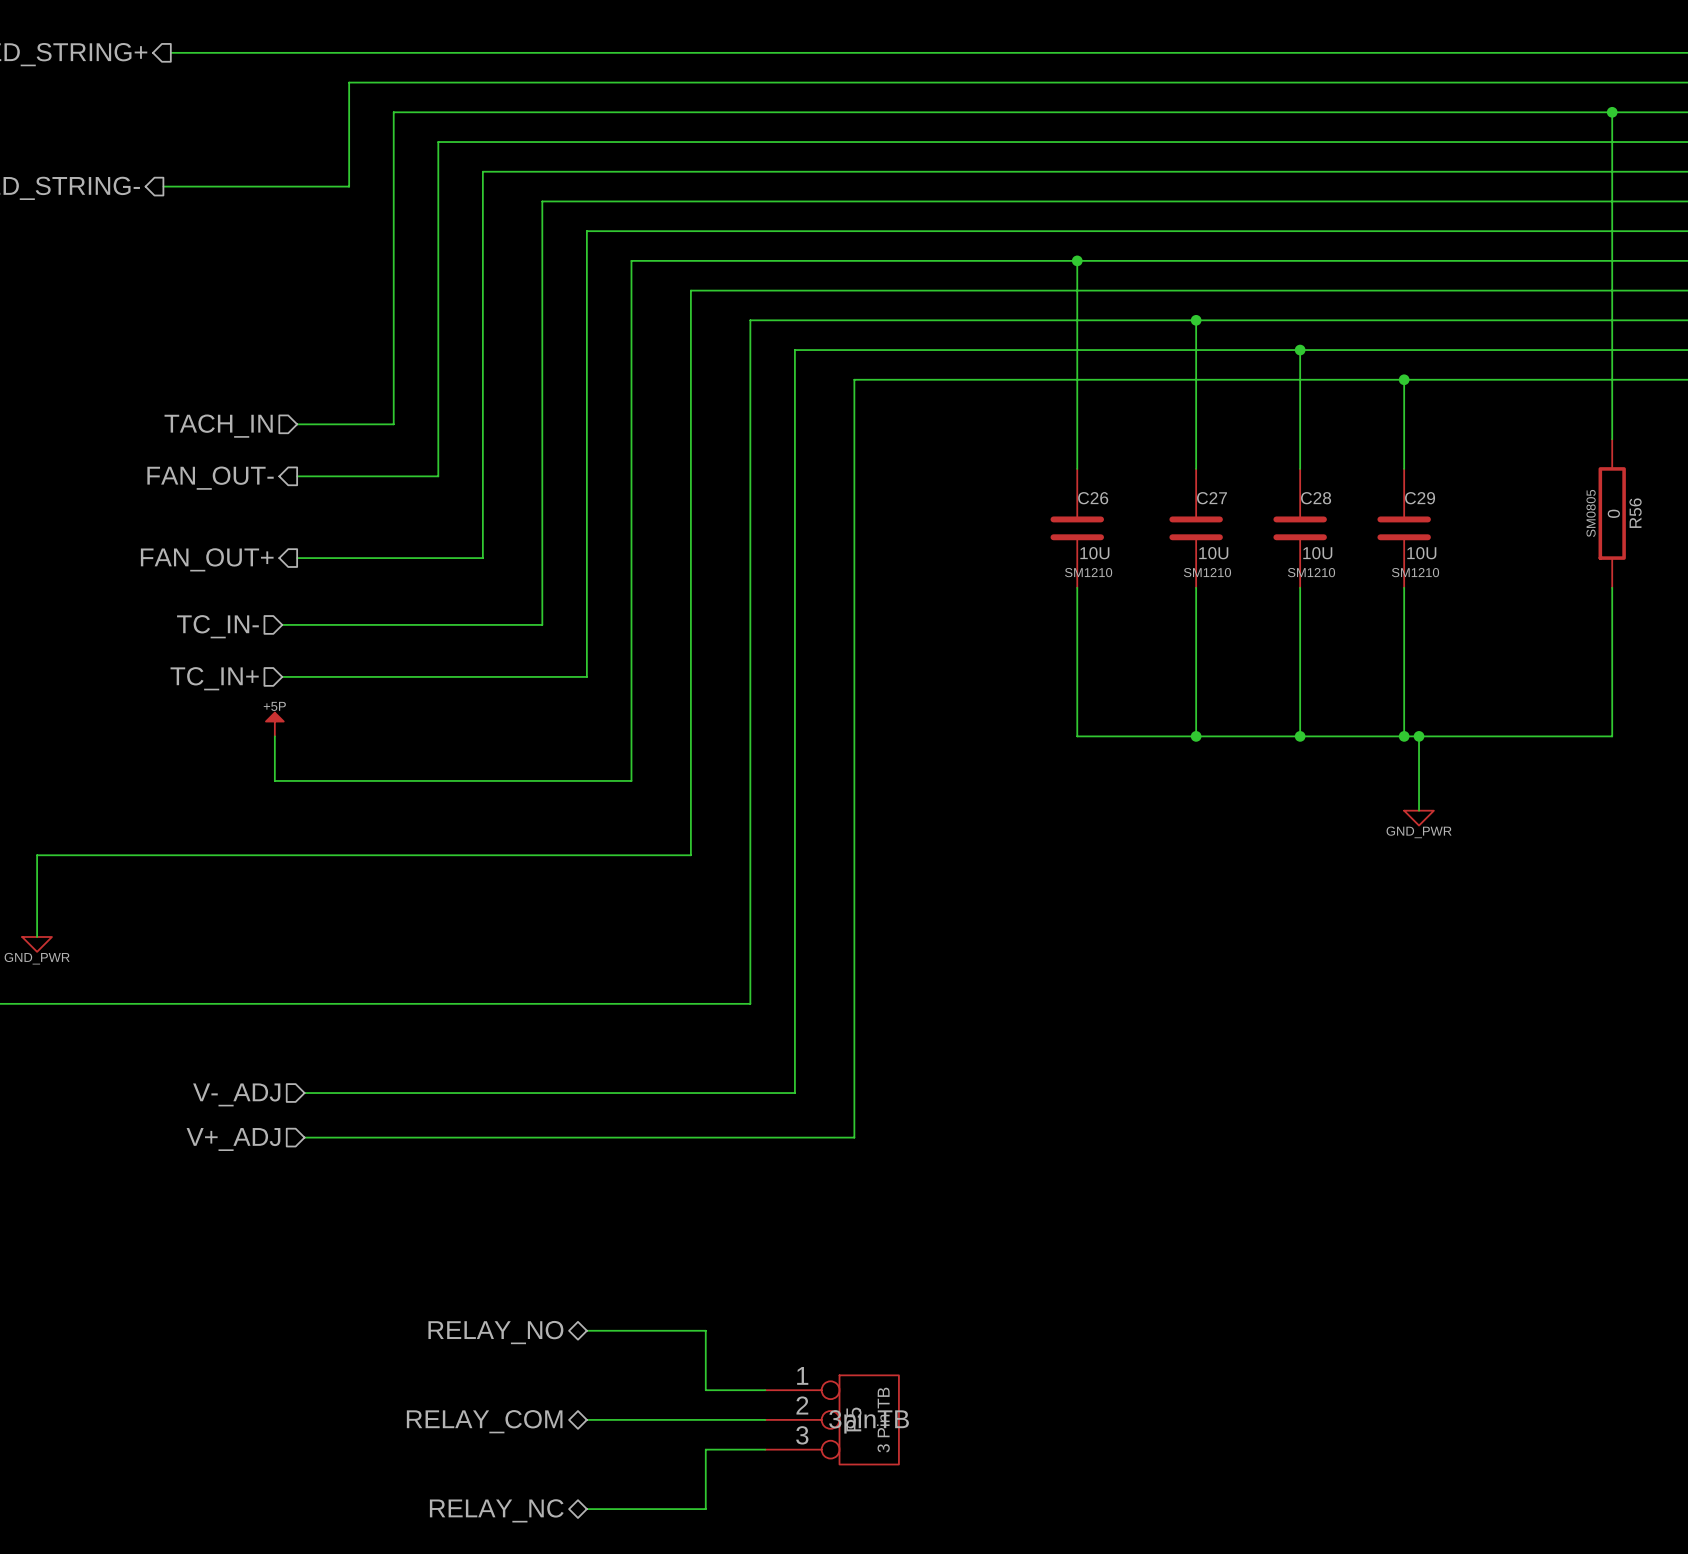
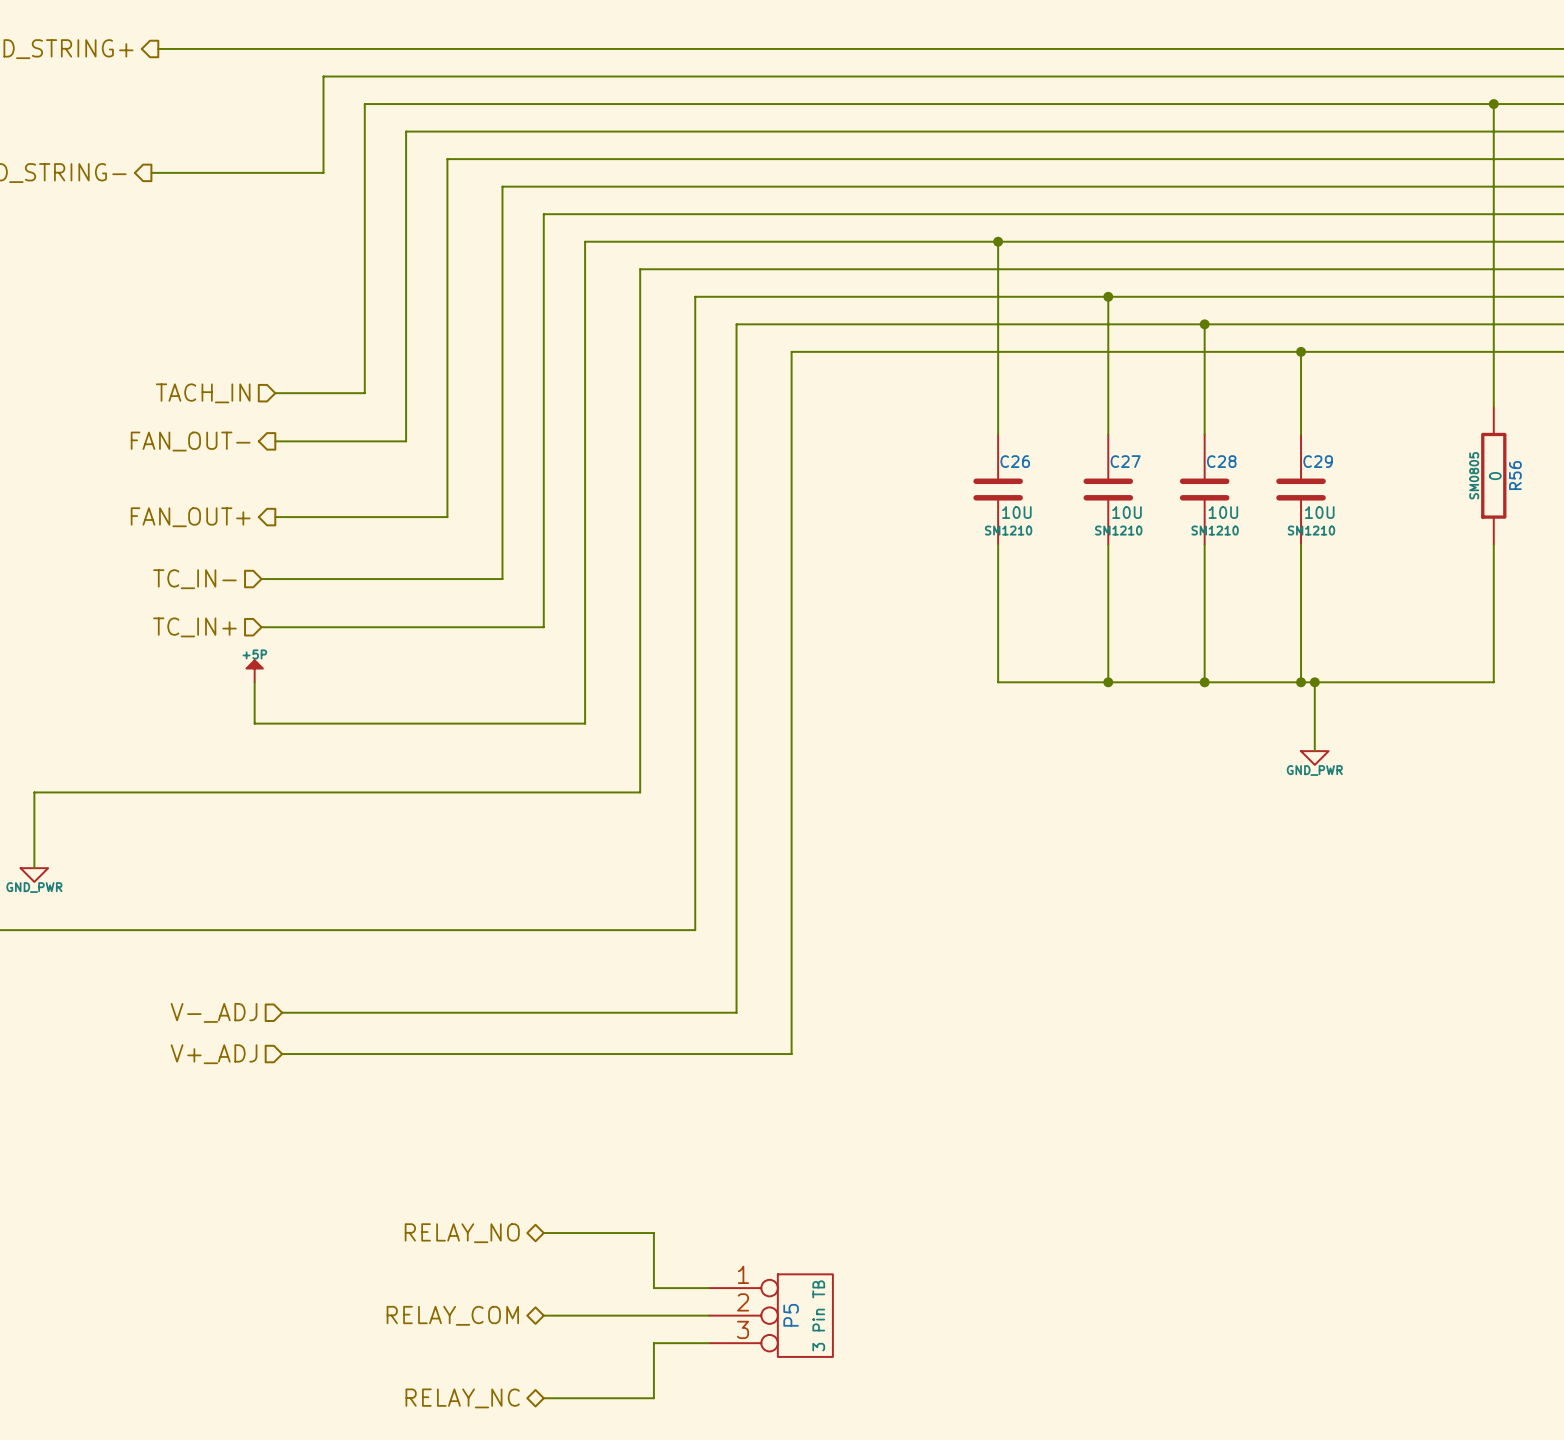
P5 text: 3pinTB (869, 1421) -> none

